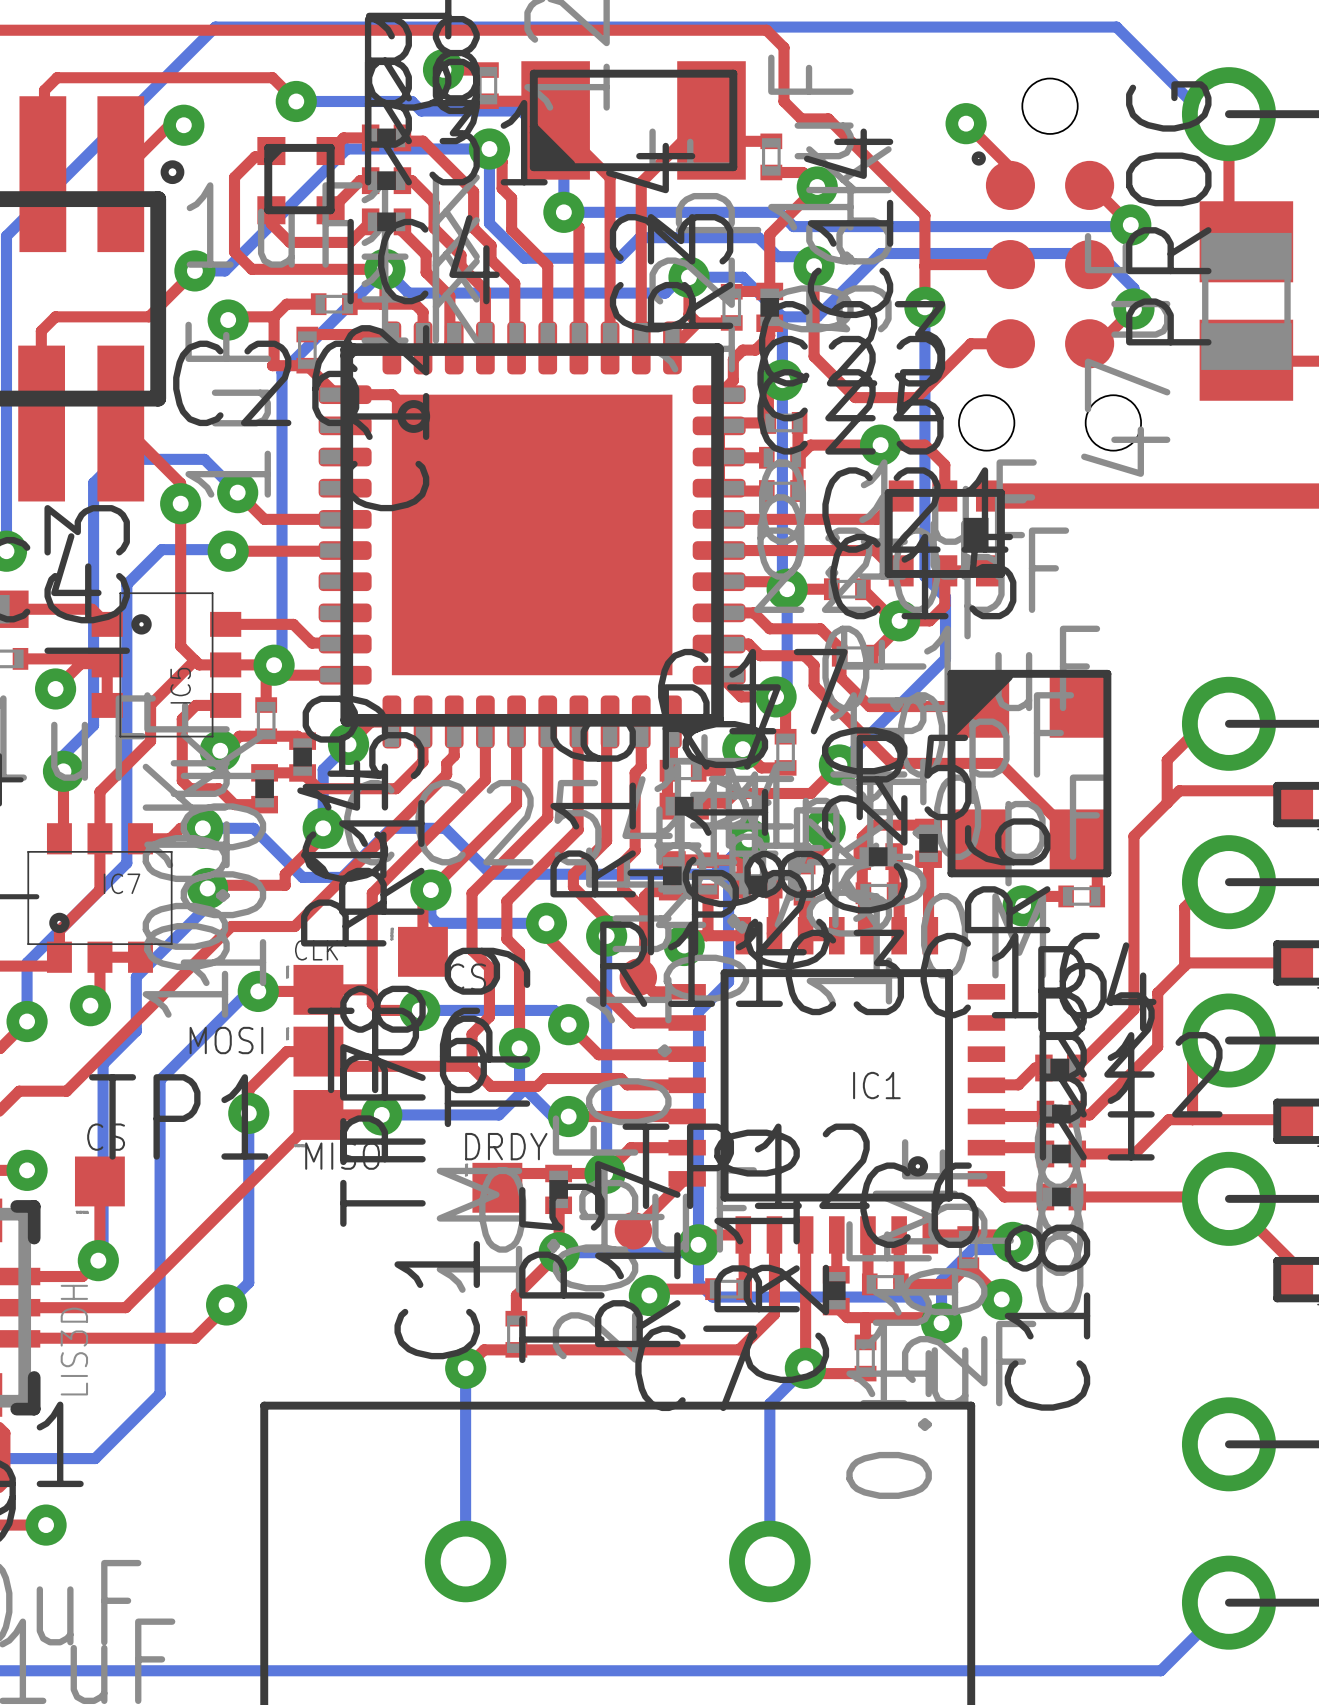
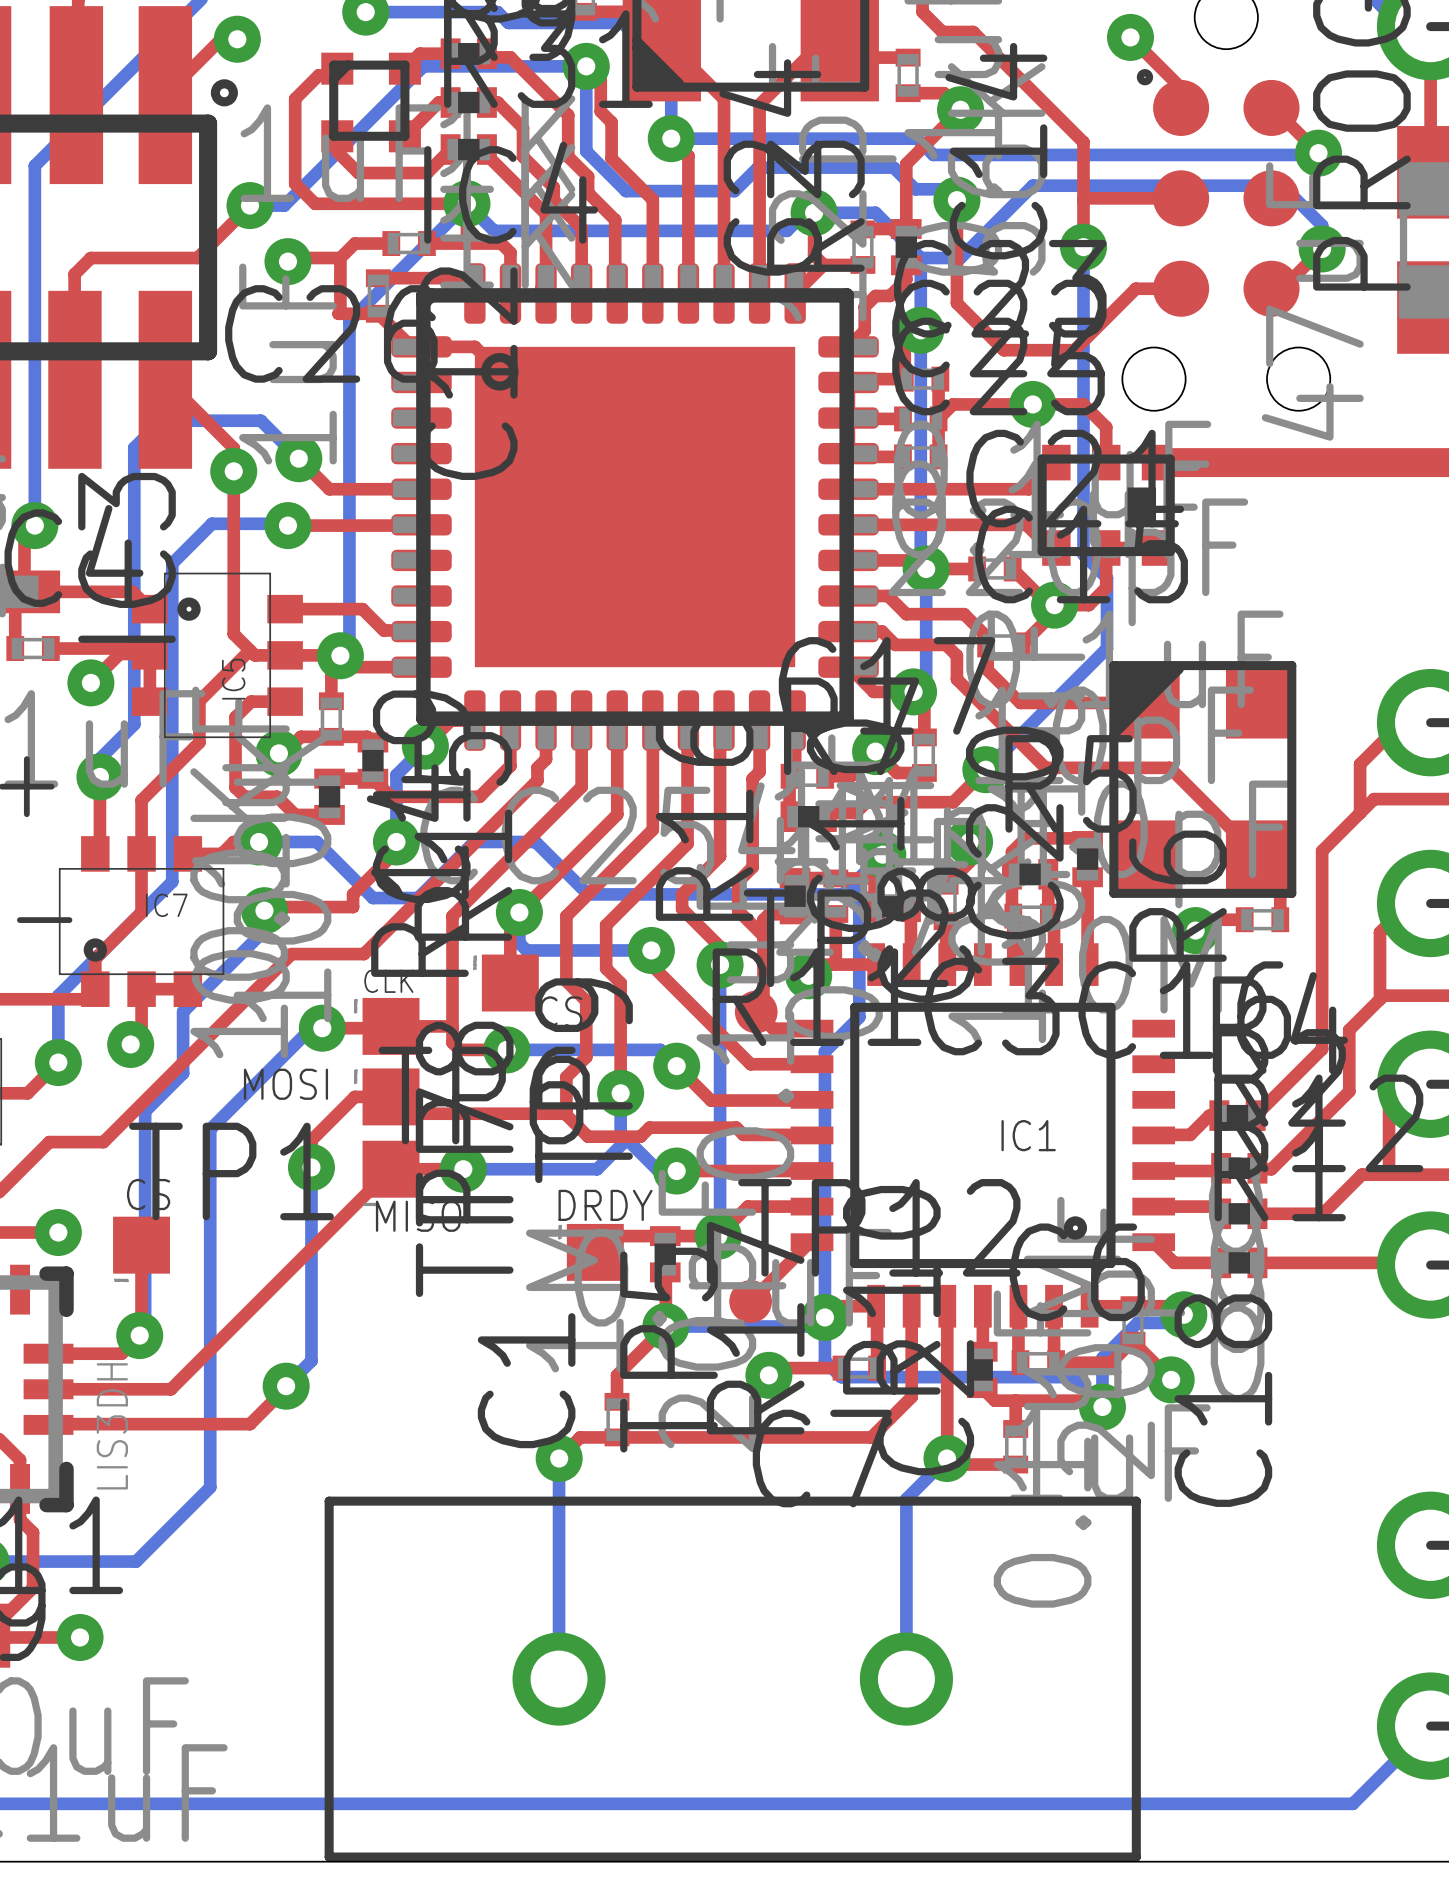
top track: (402, 226) (402, 231) (426, 255) (426, 272) (449, 296) (449, 343) -> (486, 155) (546, 214) (546, 293)

